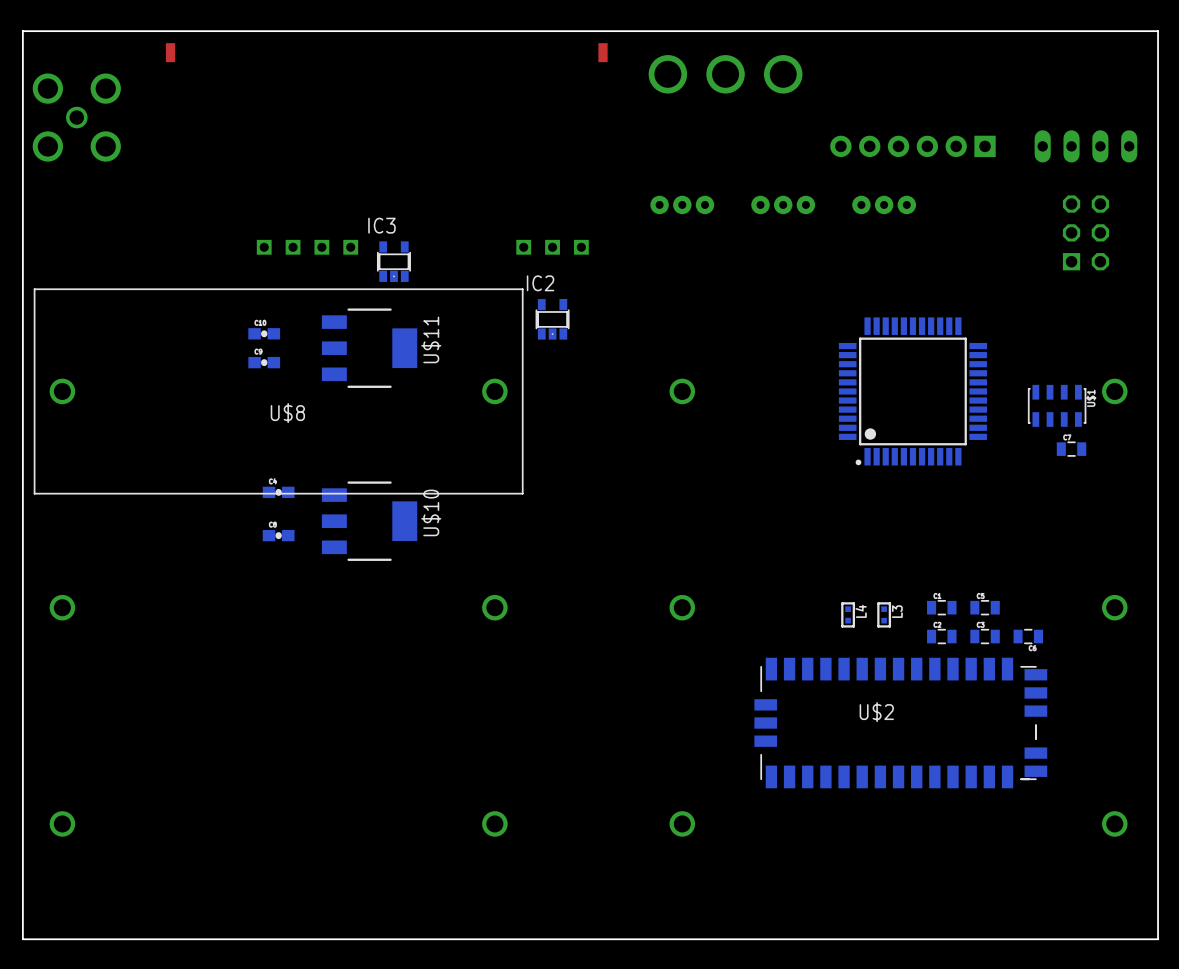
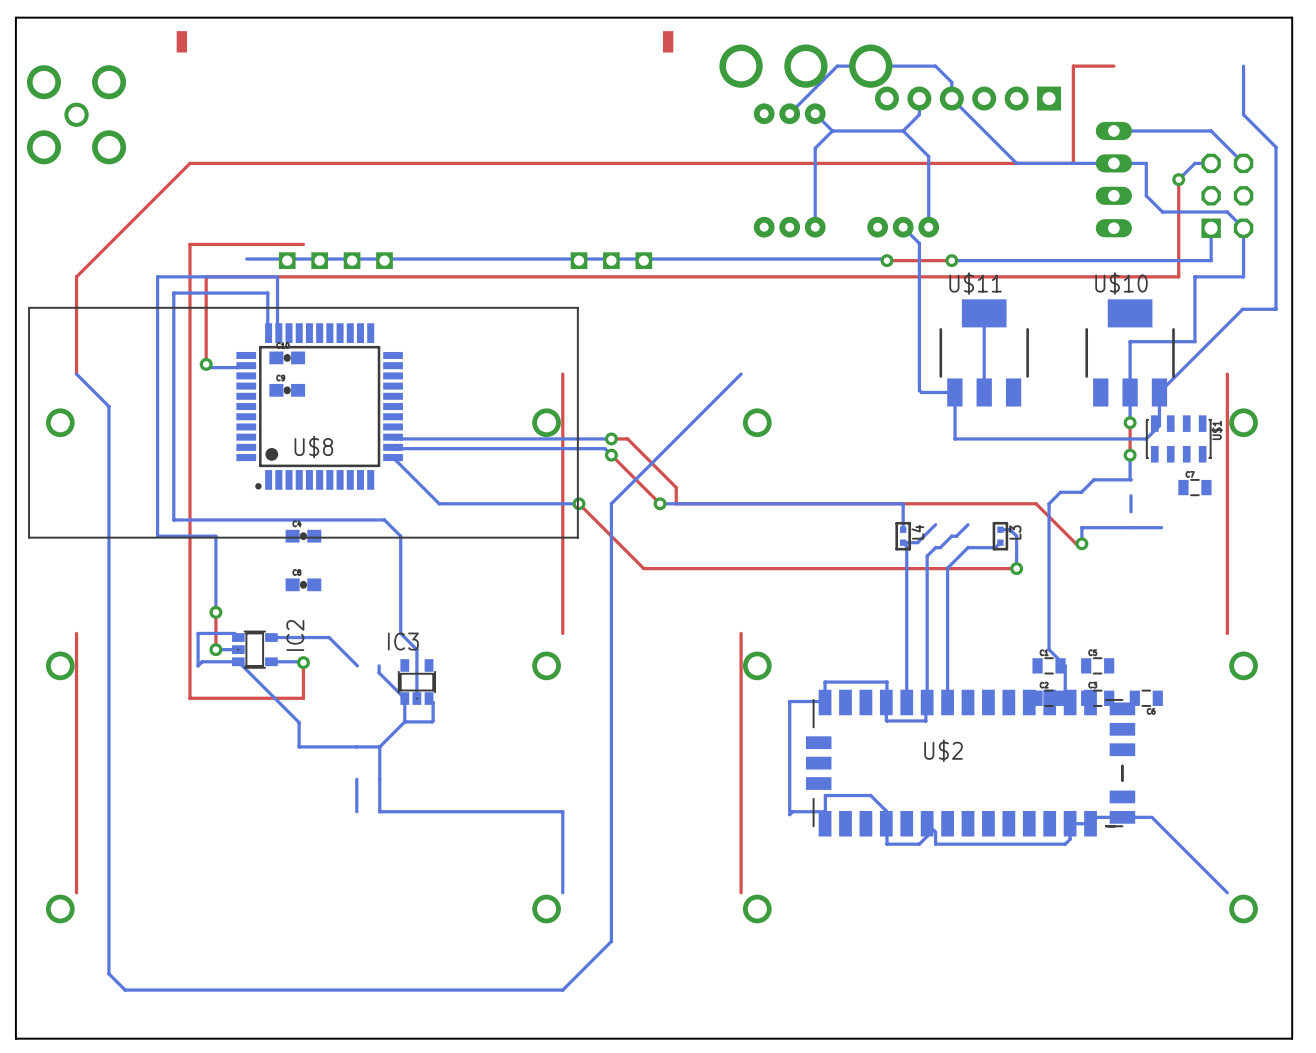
top track: none -> (1113, 66) (1073, 66) (1073, 163) (189, 163) (76, 276) (76, 374)
bottom track: none -> (1243, 66) (1243, 114) (1275, 147) (1275, 309) (1242, 309) (1159, 392) (1159, 425) (1146, 438) (955, 438) (955, 392)
bottom track: none -> (919, 98) (919, 114) (903, 130)
part: none -> (789, 113)
bottom track: none -> (815, 113) (832, 130)
bottom track: none -> (789, 114) (837, 66) (935, 66) (951, 82) (951, 98) (1016, 163) (1146, 163) (1146, 195) (1162, 212) (1227, 212) (1243, 228) (1243, 276) (1194, 276) (1194, 341) (1130, 341) (1130, 422)
bottom track: none -> (832, 130) (815, 148) (815, 227)
bottom track: none -> (903, 130) (832, 130)
bottom track: none -> (903, 130) (928, 156) (928, 227)
bottom track: none -> (1113, 130) (1211, 130) (1243, 163)
part position: (912, 146) -> (968, 98)
part rotation: 0° (1085, 146) -> 90° clockwise (1113, 179)
part position: (1085, 146) -> (1113, 179)
bottom track: none -> (1211, 163) (1194, 163) (1178, 179)
top track: none -> (1178, 179) (1178, 276) (206, 276) (206, 364)
via: none -> (1178, 179)
part position: (682, 204) -> (789, 227)
part position: (783, 204) -> (903, 227)
part: (884, 204) -> none
bottom track: none -> (903, 227) (919, 243) (919, 390) (921, 392) (954, 392)
bottom track: none -> (1211, 228) (1211, 260) (951, 260)
top track: none -> (303, 244) (189, 244) (189, 698) (303, 698) (303, 662)
part position: (1085, 232) -> (1227, 195)
bottom track: none -> (246, 259) (885, 259) (886, 260)
via: none -> (886, 260)
top track: none -> (951, 260) (886, 260)
via: none -> (951, 260)
IC3 position: (393, 261) -> (416, 682)
bottom track: none -> (984, 313) (984, 392)
bottom track: none -> (268, 333) (267, 293) (173, 293) (173, 519) (384, 519) (400, 536) (400, 633) (416, 649) (416, 698)
bottom track: none -> (278, 333) (277, 276) (157, 276) (157, 536) (215, 536) (215, 612)
IC2 rotation: 0° (552, 319) -> 90° clockwise (254, 649)
IC2 position: (552, 319) -> (254, 649)
bottom track: none -> (206, 364) (209, 367) (238, 367)
via: none -> (206, 364)
U$11 rotation: 0° (369, 348) -> 90° counterclockwise (984, 352)
U$11 position: (369, 348) -> (984, 352)
top track: none -> (562, 374) (562, 633)
bottom track: none -> (741, 374) (611, 503) (611, 941) (562, 990) (125, 990) (108, 973) (108, 406) (76, 374)
top track: none -> (1227, 374) (1227, 633)
part: none -> (319, 406)
part: (912, 391) -> none
top track: none -> (1130, 422) (1130, 455)
via: none -> (1130, 422)
bottom track: none -> (393, 437) (394, 438) (611, 438)
top track: none -> (611, 438) (627, 438) (676, 487) (676, 503) (1036, 503) (1076, 543) (1081, 543)
via: none -> (611, 438)
bottom track: none -> (393, 447) (604, 448) (611, 455)
top track: none -> (611, 455) (660, 503)
via: none -> (611, 455)
bottom track: none -> (1130, 455) (1130, 479) (1093, 479) (1081, 492) (1060, 492) (1049, 503) (1049, 649) (1065, 665) (1065, 697) (1070, 702)
via: none -> (1130, 455)
bottom track: none -> (393, 457) (439, 503) (579, 503)
bottom track: none -> (1130, 495) (1130, 511)
top track: none -> (579, 503) (643, 568) (1016, 568)
via: none -> (579, 503)
bottom track: none -> (660, 503) (903, 503) (903, 529)
via: none -> (660, 503)
bottom track: none -> (935, 524) (917, 542) (903, 542) (906, 546) (906, 702)
bottom track: none -> (968, 524) (956, 536) (951, 536) (940, 547) (935, 547) (927, 556) (925, 720) (886, 720) (886, 682) (825, 682) (825, 702) (789, 701) (789, 814) (792, 811) (825, 811)
bottom track: none -> (1161, 527) (1081, 527) (1081, 543)
bottom track: none -> (1000, 529) (1010, 529) (1016, 536) (1016, 568)
bottom track: none -> (1000, 542) (995, 547) (968, 547) (947, 568) (947, 702)
via: none -> (1081, 543)
U$10 rotation: 0° (369, 521) -> 90° counterclockwise (1130, 352)
U$10 position: (369, 521) -> (1130, 352)
via: none -> (1016, 568)
top track: none -> (215, 612) (215, 649)
via: none -> (215, 612)
top track: none -> (76, 633) (76, 892)
top track: none -> (741, 633) (741, 892)
bottom track: none -> (238, 637) (234, 633) (198, 633) (198, 665) (202, 661) (238, 661) (299, 722) (299, 746) (379, 746)
bottom track: none -> (271, 637) (329, 637) (357, 665)
via: none -> (215, 649)
bottom track: none -> (238, 649) (215, 649)
bottom track: none -> (271, 661) (303, 662)
via: none -> (303, 662)
bottom track: none -> (379, 665) (379, 672) (404, 698) (404, 721)
L4 position: (848, 614) -> (903, 536)
L3 position: (884, 614) -> (1000, 536)
bottom track: none -> (429, 698) (433, 702) (432, 721) (404, 721)
bottom track: none -> (404, 721) (379, 746)
bottom track: none -> (379, 746) (379, 811) (562, 811) (562, 892)
bottom track: none -> (356, 779) (356, 811)
U$2 position: (900, 723) -> (970, 763)
bottom track: none -> (825, 814) (825, 823) (825, 795) (870, 795) (886, 811) (886, 844) (919, 844) (927, 836) (927, 823) (935, 832) (935, 844) (1065, 844) (1070, 839) (1070, 823) (1090, 823) (1096, 817) (1151, 817) (1227, 892)

